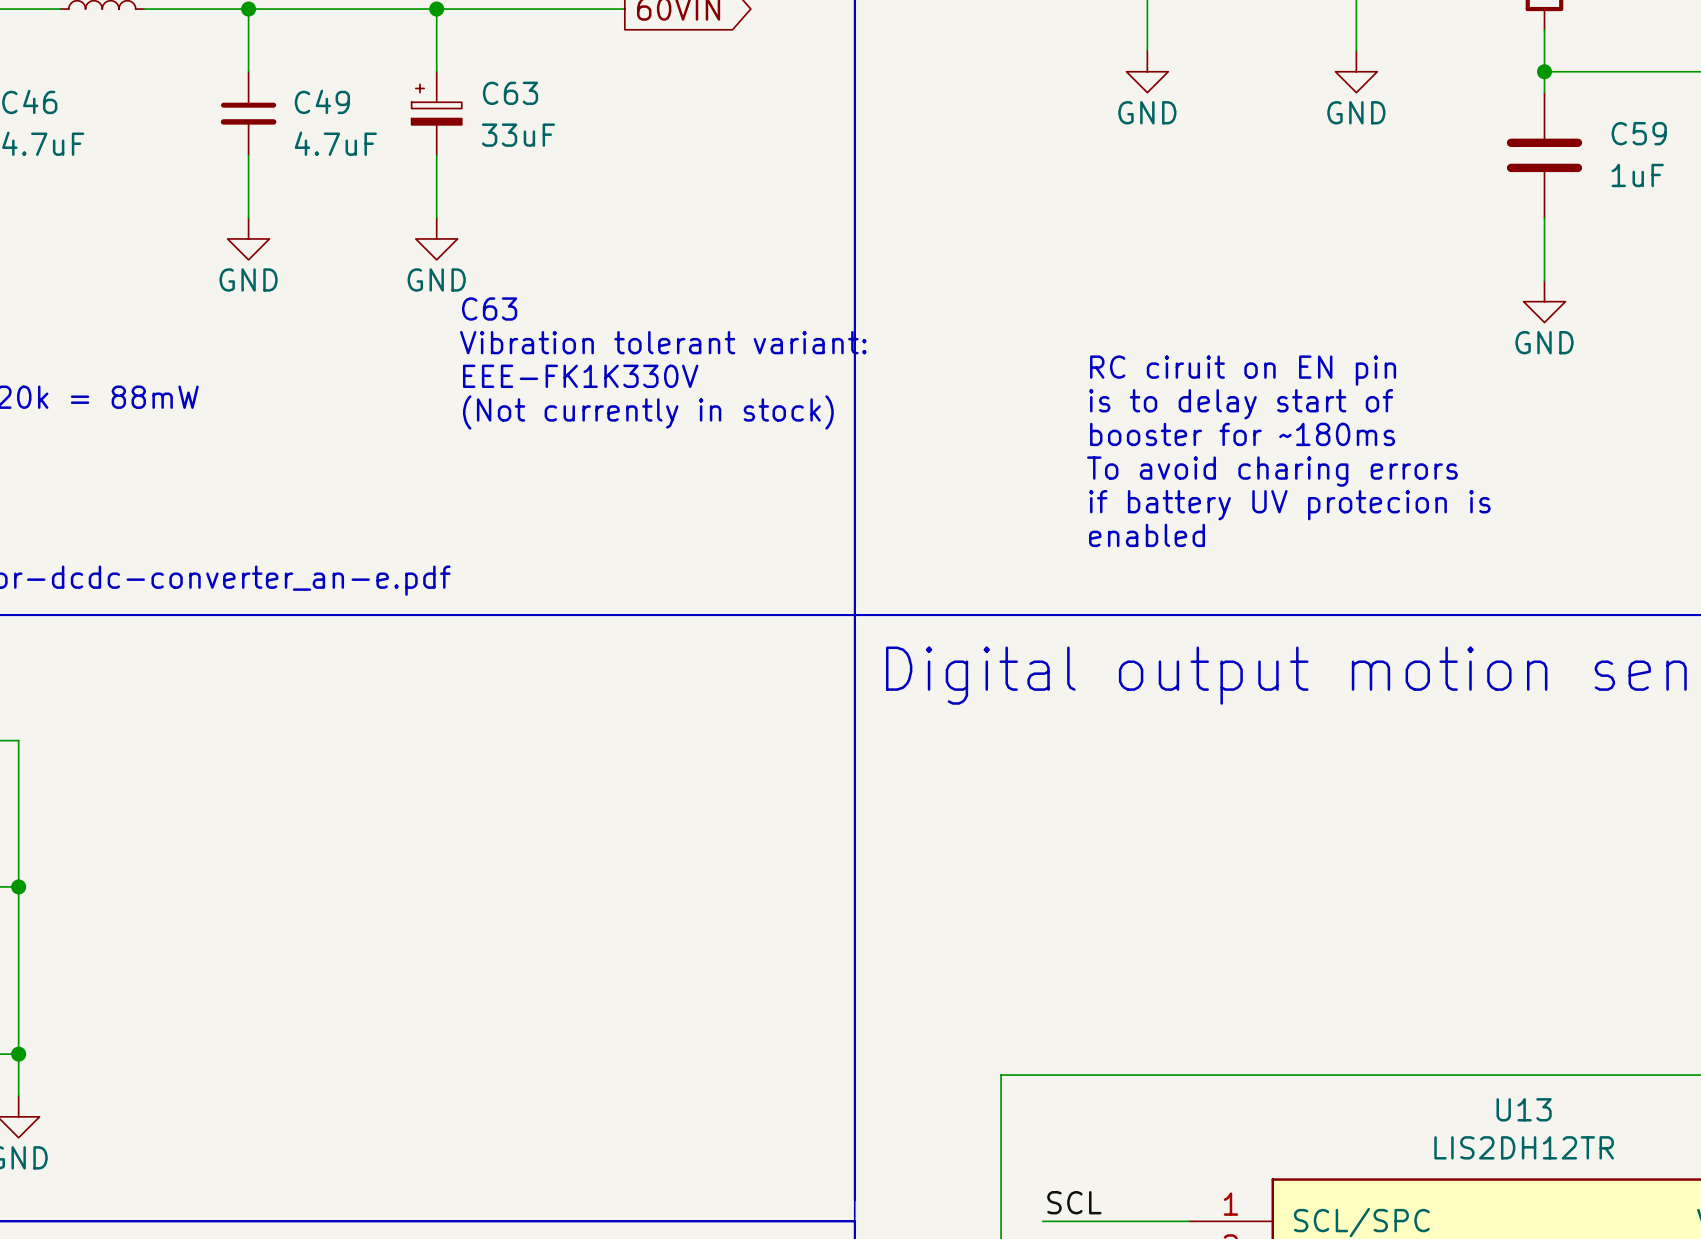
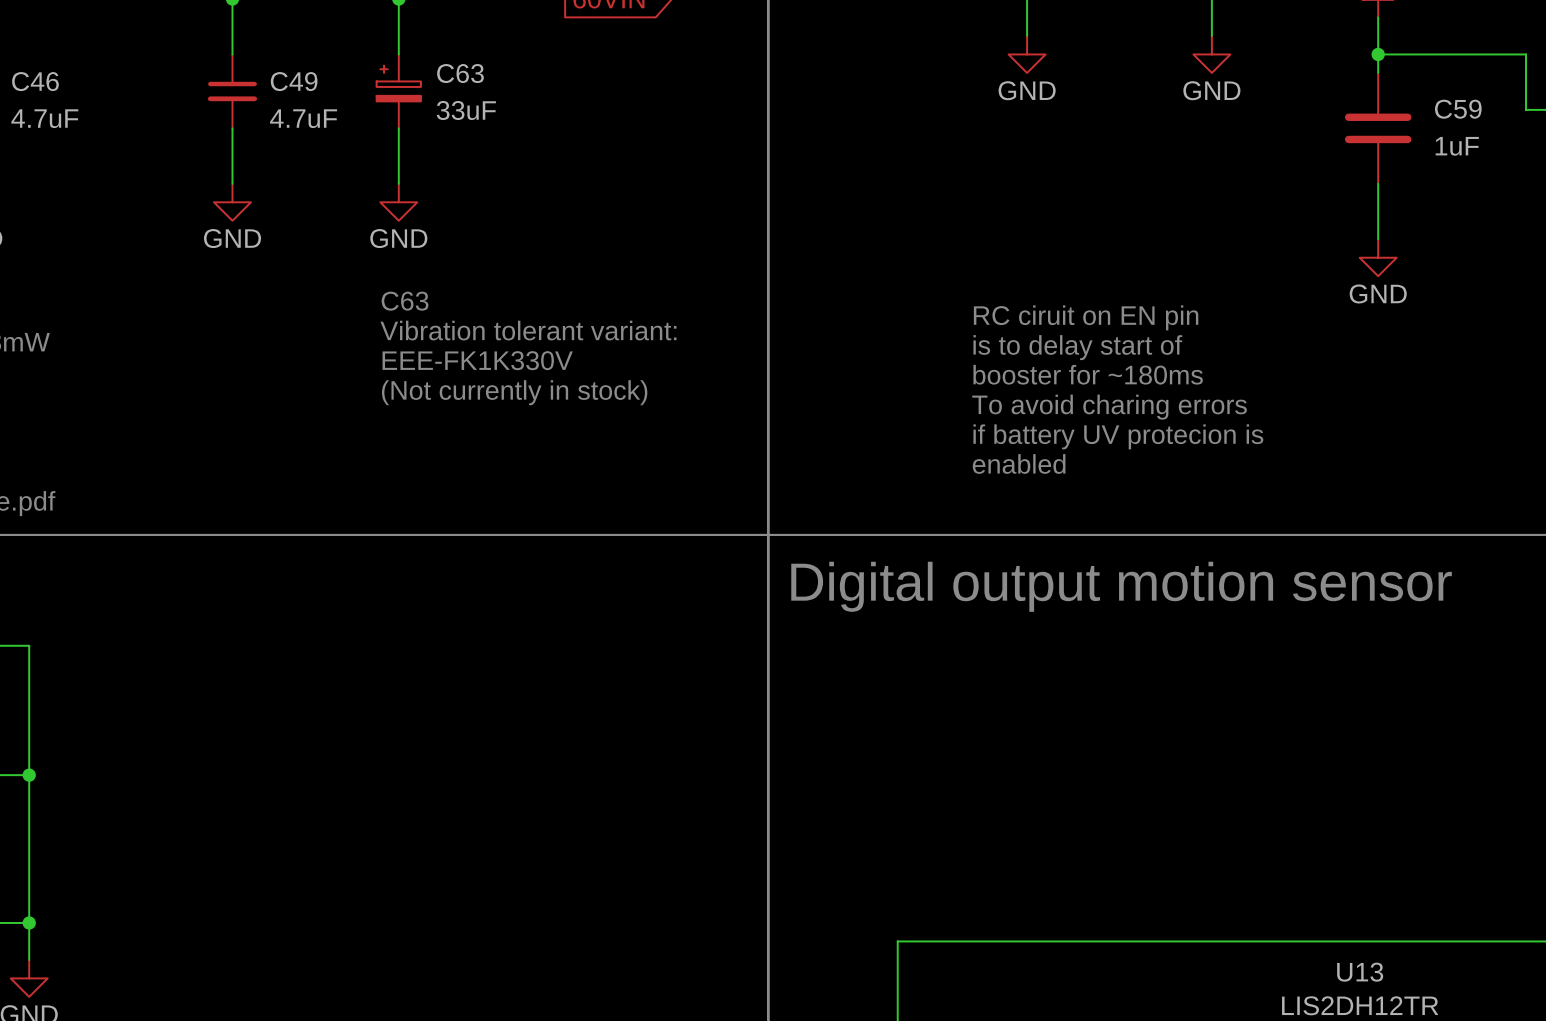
text position: C63 (489, 309) -> C63 (405, 301)
text position: Vibration tolerant variant: (663, 342) -> Vibration tolerant variant: (528, 330)
text position: EEE-FK1K330V (580, 376) -> EEE-FK1K330V (477, 360)
text position: (Not currently in stock) (648, 412) -> (Not currently in stock) (514, 392)

